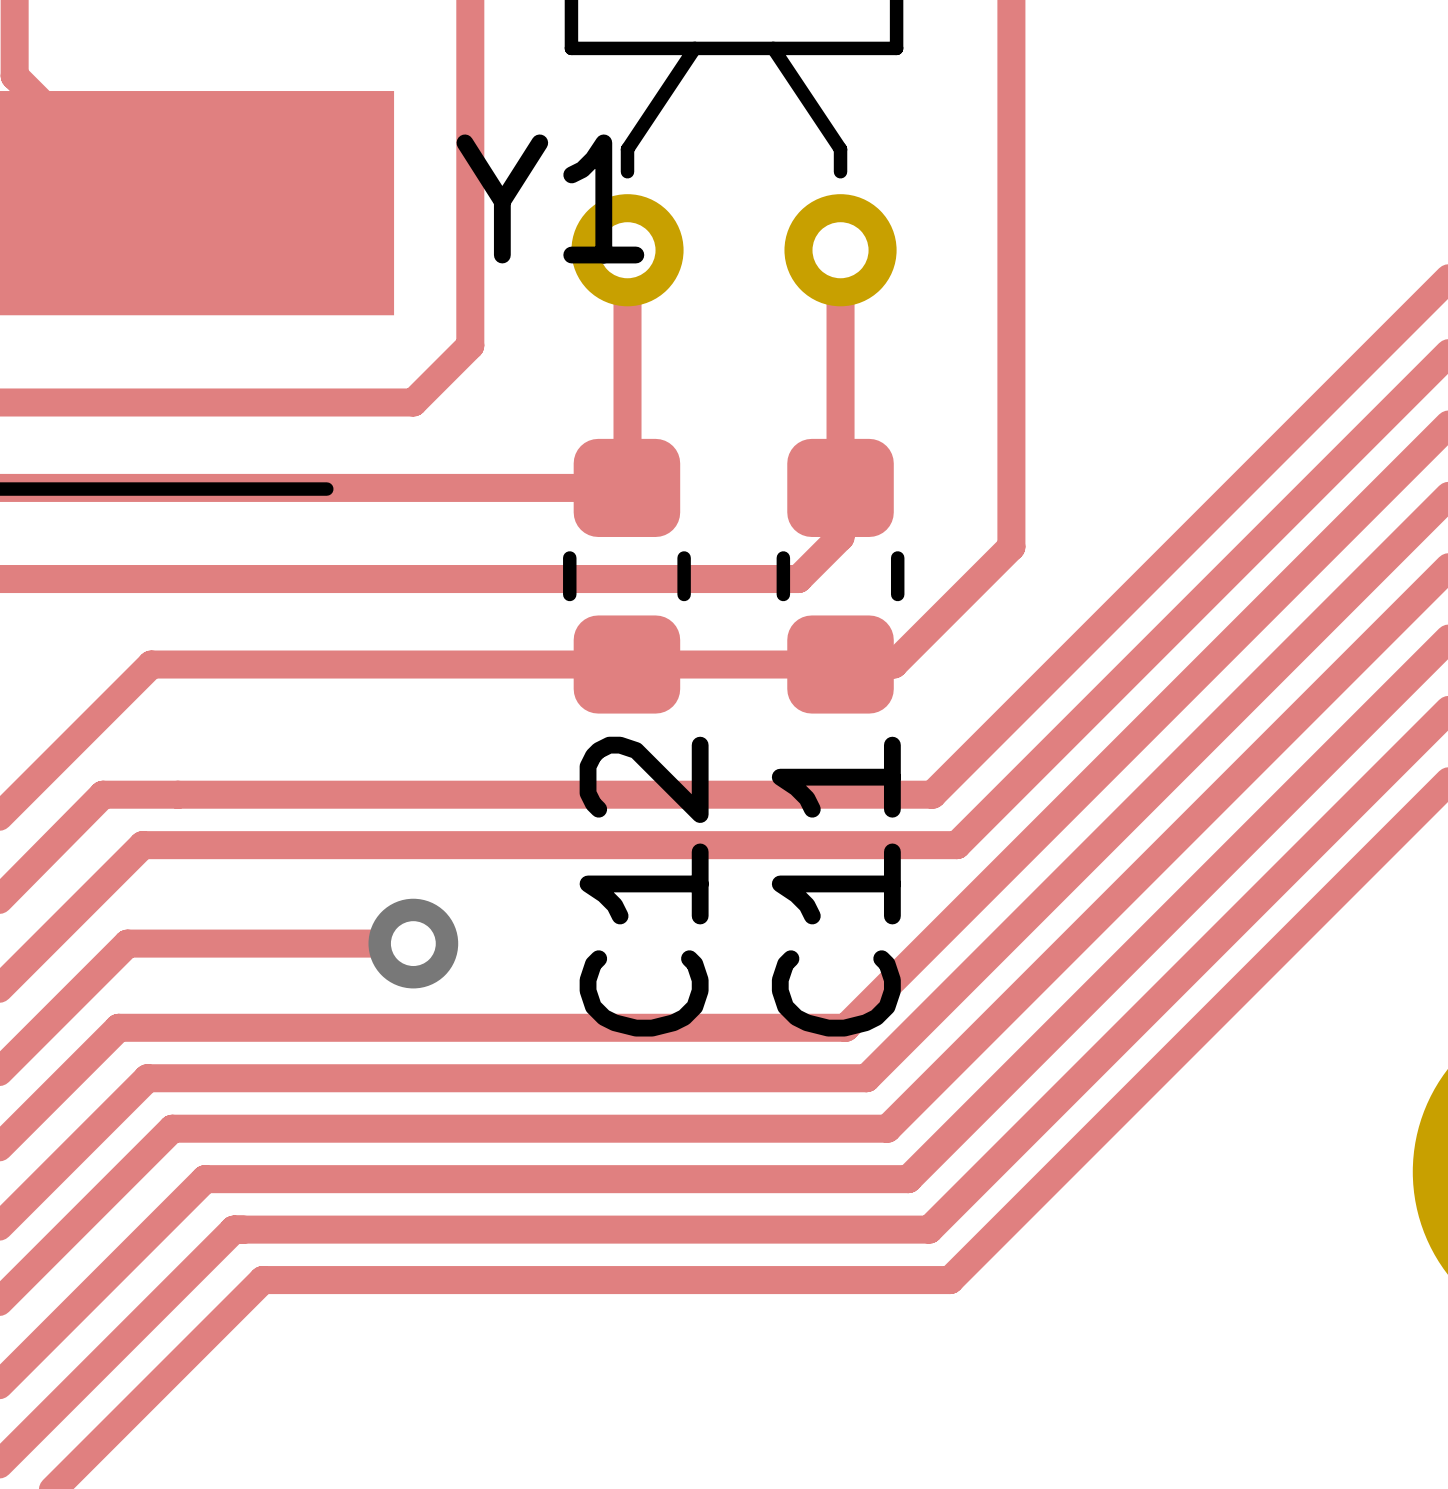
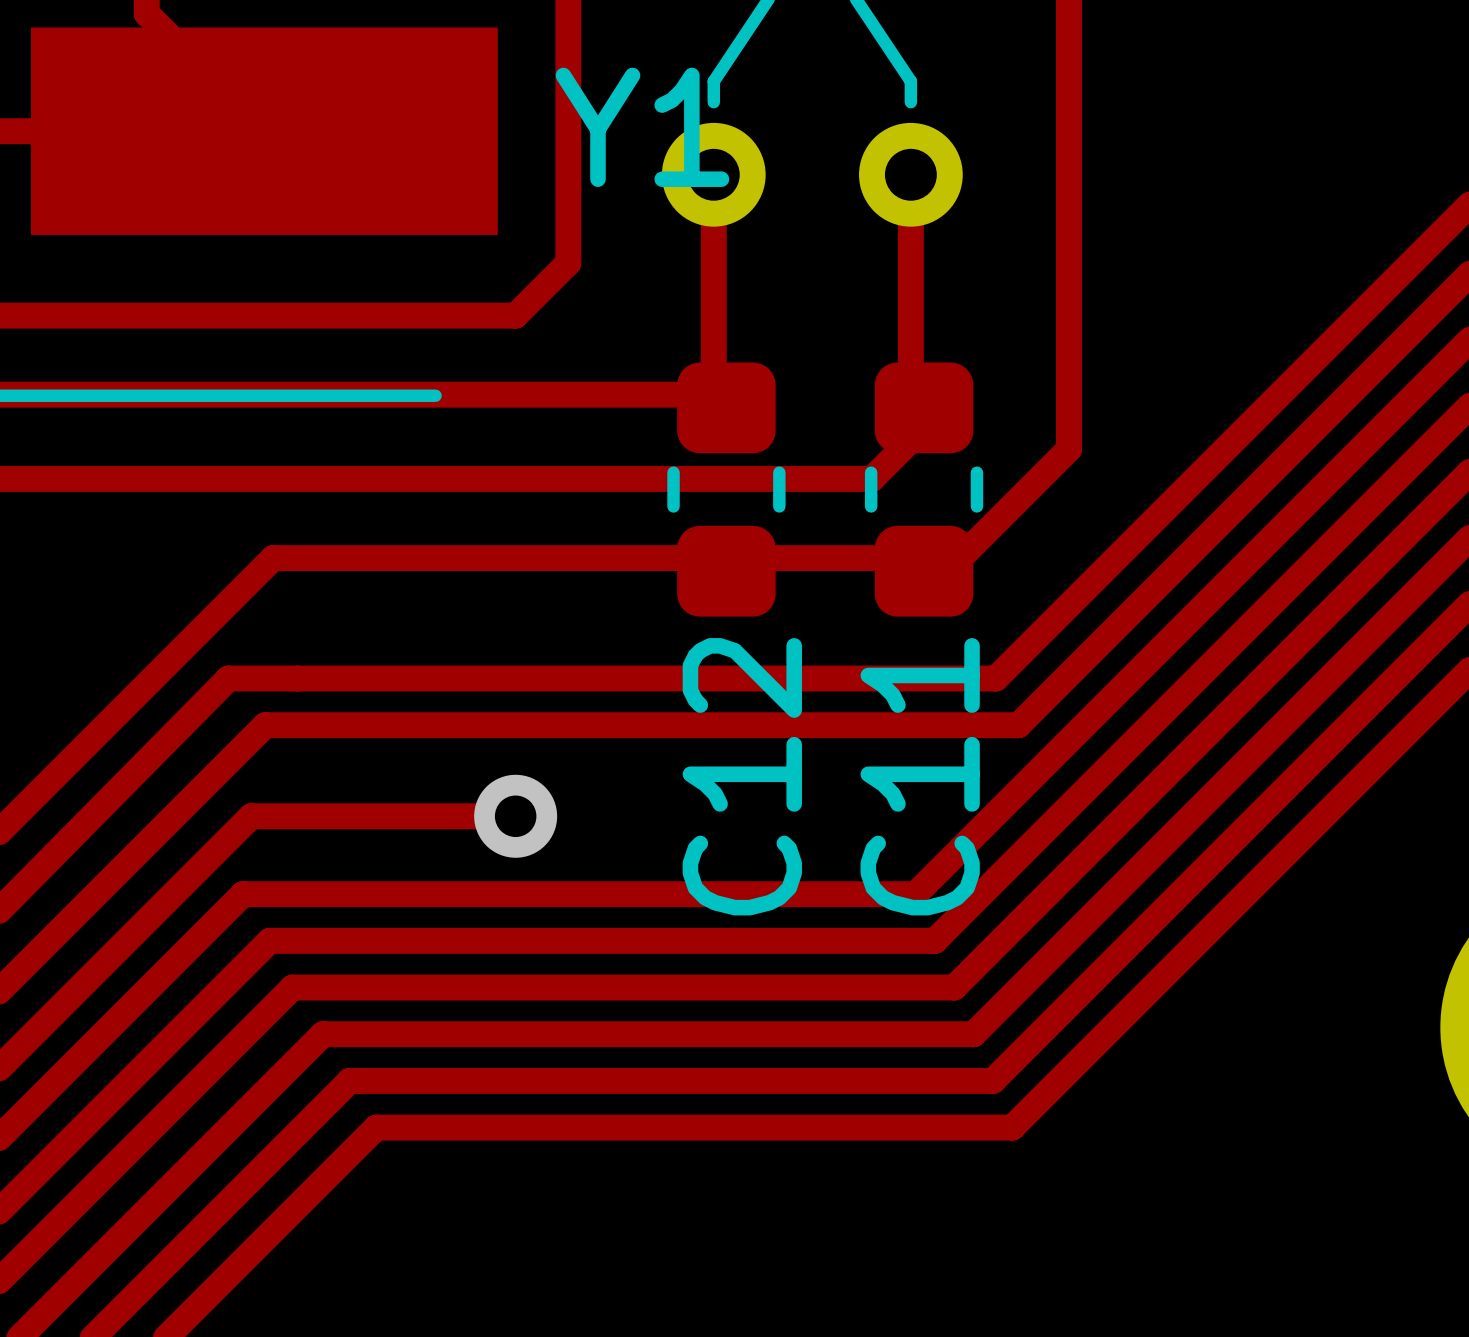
C12 position: (626, 576) -> (726, 489)
C11 position: (840, 576) -> (924, 489)

